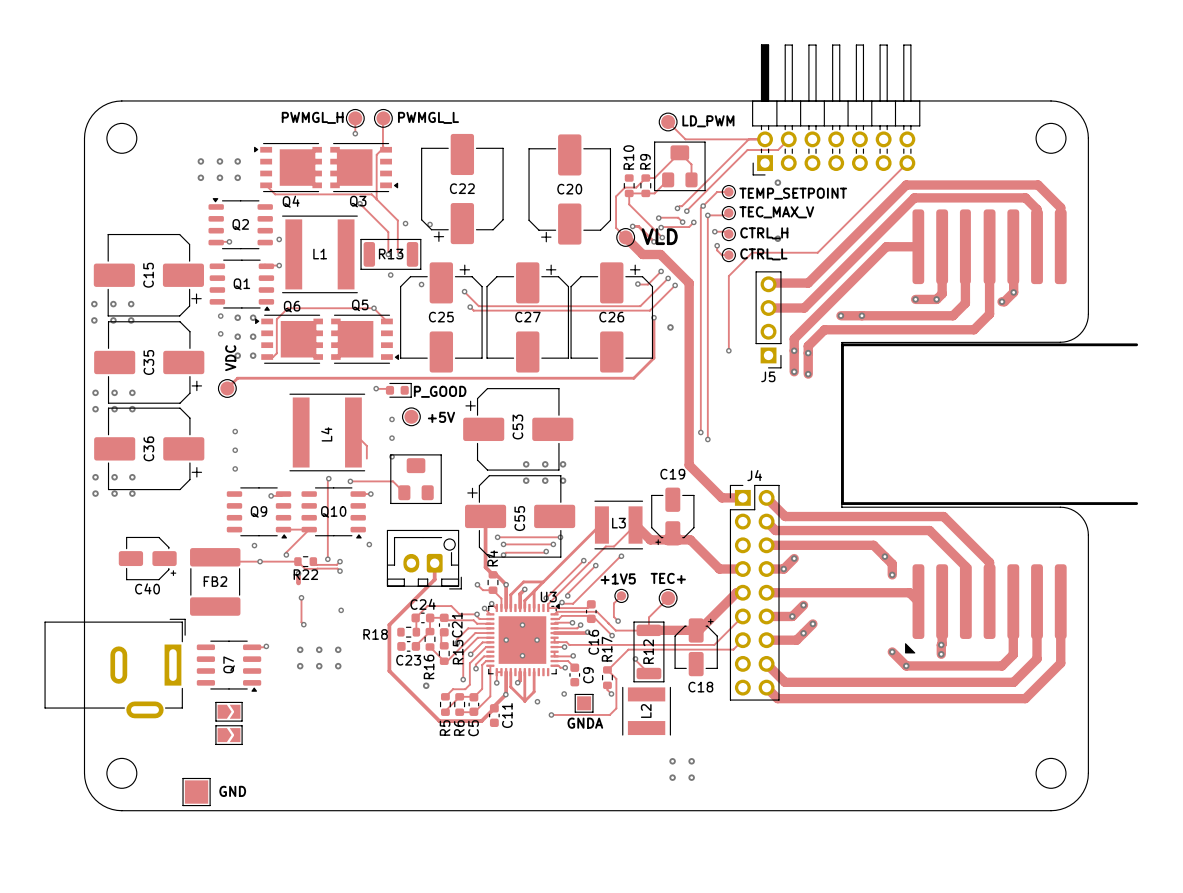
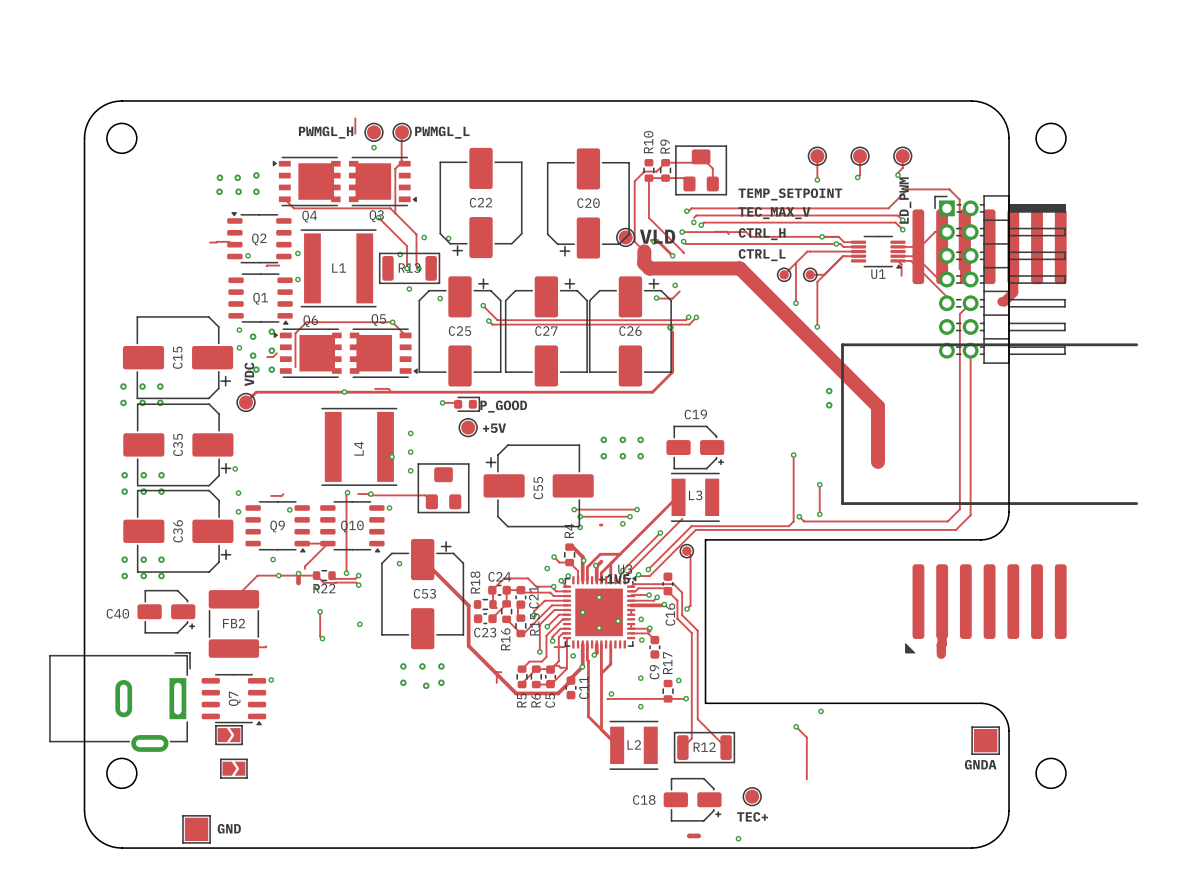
board edge: (971, 100) (1055, 101) (1069, 105) (1083, 119) (1088, 138) (1087, 321) (1077, 336) (1064, 342) (841, 342) (841, 507) (1060, 507) (1071, 509) (1082, 518) (1088, 535) (1088, 773) (1085, 787) (1073, 802) (1060, 809) (1051, 810) (121, 810) (107, 807) (95, 799) (87, 787) (84, 773) -> (971, 100) (985, 103) (998, 111) (1004, 119) (1008, 133) (1009, 511) (1006, 522) (998, 534) (980, 539) (705, 539) (705, 703) (980, 703) (991, 705) (1005, 717) (1009, 731) (1008, 815) (1004, 829) (994, 840) (985, 845) (971, 848) (116, 847) (99, 840) (87, 825) (84, 810) (84, 773)
part: (836, 109) -> none
track: (382, 116) (382, 146) (386, 149) (381, 149) (376, 154) (376, 199) -> (401, 130) (401, 160) (404, 163) (400, 163) (395, 168) (395, 213)
text position: PWMGL_H (312, 117) -> PWMGL_H (326, 132)
text position: PWMGL_L (428, 117) -> PWMGL_L (442, 132)
part: (355, 118) -> none
part: (383, 118) -> none
track: (668, 121) (685, 139) (765, 139) -> none
part: (668, 121) -> none
text: LD_PWM (708, 121) -> none
part: none -> (373, 132)
part: none -> (402, 132)
via position: (355, 133) -> (373, 147)
track: (748, 139) (681, 206) (677, 208) -> none
track: (788, 139) (778, 150) (747, 150) (686, 211) -> none
track: none -> (817, 156) (817, 179)
part: none -> (817, 156)
track: none -> (860, 156) (860, 175) (857, 177)
part: none -> (860, 156)
track: none -> (902, 156) (902, 168) (898, 175)
part: none -> (902, 156)
via: (200, 161) -> none
via: (219, 161) -> none
via: (237, 161) -> none
track: (907, 163) (817, 252) (752, 252) (728, 276) (728, 350) -> none
part position: (679, 166) -> (701, 170)
Q4 position: (288, 167) -> (306, 181)
Q3 position: (364, 167) -> (382, 181)
via: none -> (256, 175)
via: none -> (898, 175)
via: (200, 177) -> none
via: none -> (857, 177)
track: (668, 179) (654, 193) (629, 193) (629, 204) (662, 237) -> none
track: (691, 179) (691, 164) (679, 152) (654, 178) (645, 178) (636, 187) (624, 187) (616, 196) (616, 227) (642, 254) (660, 254) (689, 283) (689, 465) (721, 497) (742, 497) -> none
via: none -> (817, 179)
via: (777, 182) -> none
track: none -> (689, 183) (683, 178) (648, 178) (648, 217) (683, 253)
track: none -> (712, 183) (712, 168) (701, 156) (695, 162) (665, 162) (656, 171) (644, 171) (634, 181) (634, 241) (644, 251) (644, 263) (649, 268) (739, 268) (877, 406) (877, 461)
track: (266, 185) (275, 194) (371, 194) (397, 220) (397, 252) (400, 254) -> (284, 199) (293, 208) (390, 208) (416, 234) (416, 266) (418, 268)
R10 position: (629, 185) -> (648, 170)
R9 position: (645, 185) -> (665, 170)
C22 position: (462, 189) -> (481, 203)
C20 position: (569, 189) -> (588, 203)
via: none -> (219, 191)
via: none -> (238, 191)
via: none -> (256, 191)
track: (728, 192) (717, 192) (700, 208) (700, 432) -> none
part: (728, 192) -> none
text: none -> LD_PWM (905, 200)
track: (359, 203) (388, 232) (388, 254) -> (378, 217) (407, 246) (407, 268)
via: (359, 203) -> none
via: (703, 206) -> none
via: (677, 208) -> none
track: none -> (689, 210) (691, 208) (888, 208) (907, 189) (949, 189) (959, 199) (959, 268) (970, 279)
track: (728, 213) (726, 215) (707, 215) (707, 439) -> none
part: (728, 213) -> none
via: (707, 215) -> none
via: none -> (378, 217)
track: none -> (694, 217) (696, 215) (898, 215) (902, 220)
track: (658, 218) (678, 217) (682, 222) -> none
via: (658, 218) -> none
via: none -> (902, 220)
via: (682, 222) -> none
track: (693, 222) (689, 227) (661, 227) -> none
Q2 position: (240, 223) -> (259, 237)
via: (405, 223) -> none
via: (430, 224) -> none
track: none -> (701, 225) (703, 222) (895, 222) (902, 229)
via: none -> (701, 225)
track: (632, 226) (638, 226) (654, 241) -> (651, 240) (657, 240) (672, 255)
via: (632, 226) -> none
via: (661, 227) -> none
via: none -> (902, 229)
via: (714, 231) -> none
track: none -> (682, 232) (746, 232) (750, 236) (838, 236) (844, 242) (858, 242)
via: none -> (682, 232)
track: none -> (946, 232) (935, 232) (920, 246) (897, 246)
part: (728, 234) -> none
via: none -> (822, 236)
via: none -> (424, 237)
via: (662, 237) -> none
via: none -> (448, 238)
via: (777, 238) -> none
via: (279, 239) -> none
via: (229, 241) -> none
track: none -> (683, 241) (686, 243) (840, 243) (843, 246) (858, 246)
via: none -> (683, 241)
via: none -> (836, 243)
track: (717, 245) (717, 250) (721, 255) (728, 255) -> none
via: (717, 245) -> none
track: (918, 246) (886, 246) (794, 338) (794, 371) -> none
track: (942, 246) (942, 293) (936, 299) (915, 299) -> none
track: (965, 246) (965, 303) (952, 315) (840, 315) -> none
track: (989, 246) (989, 314) (973, 329) (824, 329) (808, 346) (808, 374) -> none
track: (1037, 246) (1037, 209) (1025, 197) (914, 197) (804, 308) (768, 308) -> none
track: (1060, 246) (1060, 207) (1038, 185) (906, 185) (808, 283) (768, 284) -> none
track: none -> (858, 251) (807, 251) (784, 274)
U1: none -> (878, 252)
via: none -> (297, 253)
L1 position: (319, 254) -> (338, 268)
via: (388, 254) -> none
R13 position: (390, 254) -> (409, 268)
via: none -> (248, 255)
via: none -> (672, 255)
part: (728, 255) -> none
track: none -> (858, 256) (843, 256) (817, 281) (817, 326)
track: none -> (897, 256) (915, 256) (938, 279) (946, 279)
track: none -> (796, 262) (796, 303)
via: (279, 265) -> none
via: none -> (407, 268)
via: none -> (418, 268)
track: (661, 271) (648, 284) (637, 284) -> none
via: (661, 271) -> none
part: none -> (784, 274)
track: none -> (810, 274) (824, 274)
part: none -> (810, 274)
C15 position: (148, 275) -> (178, 357)
via: (390, 275) -> none
track: none -> (901, 275) (901, 264) (897, 260) (910, 260) (946, 296) (946, 303)
track: (668, 278) (640, 306) (478, 306) (464, 291) -> none
via: (668, 278) -> none
via: none -> (297, 279)
part: none -> (999, 279)
via: (421, 284) -> none
via: (637, 284) -> none
Q1 position: (241, 285) -> (260, 299)
track: (675, 285) (649, 310) (473, 310) (470, 307) -> none
via: none -> (409, 289)
via: (464, 291) -> none
track: none -> (679, 291) (672, 298) (656, 298)
via: (1013, 292) -> none
via: none -> (440, 298)
via: none -> (656, 298)
via: (915, 299) -> none
via: (936, 299) -> none
via: (1002, 301) -> none
via: none -> (796, 303)
track: none -> (970, 303) (959, 313) (959, 509) (947, 521) (803, 521) (799, 516)
via: (94, 304) -> none
via: (113, 304) -> none
via: (131, 304) -> none
track: none -> (483, 305) (497, 320) (685, 320) (688, 317)
via: none -> (483, 305)
via: (470, 307) -> none
via: (374, 308) -> none
via: (840, 315) -> none
via: (861, 315) -> none
via: (220, 316) -> none
via: (237, 317) -> none
via: (253, 317) -> none
C25 position: (441, 317) -> (460, 331)
C27 position: (527, 317) -> (546, 331)
C26 position: (611, 317) -> (630, 331)
track: (654, 317) (654, 358) (633, 378) (237, 378) (227, 388) -> (672, 331) (672, 372) (652, 392) (256, 392) (246, 402)
via: (654, 317) -> none
via: none -> (688, 317)
track: none -> (696, 317) (689, 324) (492, 324) (488, 321)
via: none -> (696, 317)
J5: (768, 319) -> none
via: (94, 320) -> none
via: (113, 320) -> none
via: (131, 320) -> none
track: (386, 321) (374, 308) (287, 308) (276, 319) (276, 353) -> (404, 335) (392, 322) (306, 322) (295, 333) (295, 367)
via: none -> (488, 321)
via: none -> (392, 322)
via: none -> (817, 326)
via: none -> (239, 330)
via: none -> (271, 331)
via: (220, 333) -> none
via: (237, 336) -> none
Q6 position: (289, 339) -> (307, 353)
Q5 position: (365, 339) -> (383, 353)
via: none -> (239, 347)
via: none -> (271, 350)
via: (728, 350) -> none
via: (794, 350) -> none
track: none -> (970, 350) (970, 515) (955, 529) (695, 529) (649, 576) (638, 574)
via: (808, 353) -> none
via: (237, 355) -> none
text position: VDC (230, 358) -> VDC (249, 374)
C35 position: (149, 362) -> (178, 444)
via: none -> (256, 369)
via: none -> (271, 369)
via: (794, 371) -> none
via: (808, 374) -> none
via: none -> (123, 386)
via: none -> (142, 386)
via: none -> (160, 386)
part position: (227, 388) -> (246, 402)
via: (376, 388) -> none
part position: (398, 390) -> (466, 404)
via: none -> (344, 391)
text position: P_GOOD (440, 391) -> P_GOOD (503, 406)
via: none -> (829, 391)
via: (95, 392) -> none
via: (114, 392) -> none
via: (132, 392) -> none
via: none -> (123, 402)
via: none -> (142, 402)
via: none -> (160, 402)
track: none -> (442, 402) (458, 404)
via: none -> (442, 402)
via: none -> (829, 405)
via: (95, 409) -> none
via: (114, 409) -> none
via: (132, 409) -> none
part position: (411, 416) -> (468, 427)
text position: +5V (441, 417) -> +5V (494, 428)
via: (392, 419) -> none
C53 rotation: 0° (518, 429) -> 90° clockwise (422, 594)
C53 position: (518, 429) -> (422, 594)
via: (235, 431) -> none
L4 position: (327, 432) -> (359, 446)
track: (353, 432) (366, 445) (366, 458) -> none
via: (700, 432) -> none
via: none -> (410, 433)
via: (392, 438) -> none
via: none -> (603, 439)
via: none -> (622, 439)
via: none -> (640, 439)
via: (707, 439) -> none
C36 position: (149, 448) -> (178, 531)
via: (235, 450) -> none
via: none -> (410, 452)
track: none -> (793, 455) (793, 521) (788, 526) (691, 526) (648, 569)
via: none -> (793, 455)
via: none -> (603, 456)
via: none -> (622, 456)
via: none -> (640, 456)
via: (526, 464) -> none
via: (545, 464) -> none
via: (563, 464) -> none
via: none -> (410, 470)
via: none -> (124, 475)
via: none -> (143, 475)
via: none -> (161, 475)
via: (95, 477) -> none
via: (114, 477) -> none
via: (132, 477) -> none
track: (328, 478) (327, 559) -> (347, 492) (346, 573)
via: (328, 478) -> none
part position: (416, 479) -> (443, 488)
via: (526, 480) -> none
via: (545, 480) -> none
via: (563, 480) -> none
track: (350, 481) (393, 481) (404, 492) -> none
via: (350, 481) -> none
track: none -> (819, 484) (819, 514)
via: none -> (819, 484)
via: none -> (124, 491)
via: none -> (143, 491)
via: none -> (161, 491)
via: none -> (347, 492)
via: (95, 493) -> none
via: (114, 493) -> none
via: (132, 493) -> none
via: none -> (238, 493)
via: (271, 495) -> none
track: none -> (369, 495) (425, 495) (431, 501)
track: none -> (678, 497) (601, 572) (601, 580)
track: (766, 497) (785, 516) (943, 516) (989, 562) (989, 601) -> none
via: none -> (389, 508)
via: none -> (289, 509)
via: none -> (574, 509)
via: none -> (637, 509)
via: none -> (238, 511)
Q9 position: (258, 512) -> (277, 526)
Q10 position: (333, 512) -> (352, 526)
via: none -> (819, 514)
track: (485, 516) (485, 567) (506, 584) -> none
C55 position: (520, 516) -> (538, 485)
via: none -> (580, 516)
via: none -> (629, 516)
C19 rotation: 0° (672, 516) -> 90° counterclockwise (695, 447)
C19 position: (672, 516) -> (695, 447)
via: none -> (799, 516)
track: none -> (682, 518) (624, 576)
track: (766, 521) (775, 530) (929, 530) (965, 566) (965, 601) -> none
via: none -> (622, 523)
track: (600, 525) (524, 600) (524, 607) -> none
L3 position: (618, 525) -> (695, 497)
via: none -> (580, 527)
track: (283, 529) (301, 529) -> (302, 543) (320, 543)
track: (309, 529) (286, 552) (286, 554) -> (327, 543) (305, 566) (305, 568)
via: none -> (660, 532)
track: (497, 537) (560, 537) -> (574, 509) (637, 509)
via: (497, 537) -> none
via: (560, 537) -> none
via: (369, 544) -> none
track: (503, 544) (553, 544) -> (580, 516) (629, 516)
via: (503, 544) -> none
via: (553, 544) -> none
via: (254, 545) -> none
track: (766, 545) (873, 545) (892, 563) (892, 574) -> none
track: none -> (569, 547) (572, 547) (582, 557)
track: (546, 551) (505, 552) (503, 555) -> none
via: (546, 551) -> none
track: none -> (686, 551) (690, 554) (690, 605) (687, 609)
via: (286, 554) -> none
via: (503, 555) -> none
track: (621, 556) (573, 603) (561, 602) -> none
via: (621, 556) -> none
via: (884, 556) -> none
via: none -> (554, 557)
C40 position: (147, 558) -> (166, 611)
track: (794, 558) (783, 569) (766, 569) -> none
via: (794, 558) -> none
via: none -> (124, 559)
via: none -> (143, 559)
via: none -> (161, 559)
via: none -> (273, 559)
via: (327, 559) -> none
track: none -> (422, 559) (468, 605) (468, 646) (516, 693) (558, 693) (582, 666) (582, 644)
part: (424, 559) -> none
track: (583, 560) (546, 598) -> (660, 532) (622, 570)
track: (238, 561) (297, 561) (305, 568) (337, 568) (340, 571) -> none
via: (260, 561) -> none
R22 position: (305, 561) -> (324, 575)
track: (313, 561) (316, 564) (336, 564) (340, 561) -> (332, 575) (335, 578) (355, 578) (358, 575)
via: (340, 561) -> none
via: none -> (399, 563)
track: (434, 563) (434, 579) (389, 624) (389, 671) (439, 721) (481, 721) (506, 694) (506, 672) -> none
track: (595, 565) (567, 593) (567, 595) -> none
via: none -> (547, 568)
via: none -> (648, 569)
track: (742, 569) (719, 569) (690, 539) (679, 539) (672, 533) (666, 539) (650, 539) (635, 525) (614, 546) (605, 546) (548, 604) (548, 607) (587, 608) (591, 604) -> none
via: (783, 569) -> none
via: none -> (622, 570)
via: (340, 571) -> none
via: none -> (346, 573)
via: none -> (638, 574)
via: (892, 574) -> none
via: none -> (278, 575)
via: none -> (358, 575)
via: none -> (124, 576)
via: none -> (143, 576)
via: none -> (161, 576)
via: none -> (568, 576)
text: TEC+ (668, 578) -> none
via: none -> (561, 580)
FB2 position: (215, 581) -> (233, 623)
track: (543, 581) (523, 581) (510, 594) (510, 607) -> (620, 554) (600, 554) (587, 567) (587, 580)
R4 position: (493, 582) -> (569, 554)
track: (477, 584) (482, 590) (493, 590) (501, 598) (501, 607) -> (554, 557) (559, 562) (569, 562) (578, 570) (578, 580)
via: (477, 584) -> none
track: (506, 584) (506, 607) -> (582, 557) (582, 580)
via: (506, 584) -> none
track: none -> (358, 585) (356, 582) (323, 582) (316, 575) (257, 575) (233, 599)
via: none -> (358, 585)
via: none -> (553, 586)
track: none -> (631, 586) (633, 584) (673, 584) (682, 592) (682, 615) (697, 630) (697, 719) (726, 747)
via: none -> (317, 587)
C40 name position: C40 (147, 588) -> C40 (117, 613)
track: (524, 589) (520, 594) (520, 607) -> (601, 561) (596, 566) (596, 580)
via: (524, 589) -> none
track: (534, 591) (534, 607) -> (610, 563) (610, 580)
track: none -> (631, 591) (635, 591) (638, 588) (665, 588) (677, 600) (677, 618) (691, 633) (691, 738) (682, 747)
track: (742, 592) (736, 592) (698, 630) (648, 630) -> none
J4: (754, 592) -> none
track: (766, 592) (909, 592) (918, 601) -> none
via: (567, 595) -> none
track: (621, 595) (613, 603) (613, 616) (618, 621) -> none
part position: (621, 595) -> (686, 551)
via: none -> (649, 595)
track: (301, 597) (301, 622) (303, 624) -> (320, 611) (320, 636) (322, 638)
via: (301, 597) -> none
via: none -> (599, 597)
via: none -> (657, 597)
via: (546, 598) -> none
track: (668, 598) (648, 617) (648, 630) -> none
part: (668, 598) -> none
track: (1013, 601) (1013, 654) (1002, 665) (906, 665) (892, 651) -> none
track: (1037, 601) (1037, 658) (1013, 682) (784, 682) (766, 663) -> none
track: (1060, 601) (1060, 663) (1025, 698) (777, 698) (766, 687) -> none
via: (561, 602) -> none
via: (491, 603) -> none
via: none -> (664, 604)
track: (803, 605) (792, 616) (766, 616) -> none
via: (803, 605) -> none
track: (484, 608) (490, 614) -> (561, 580) (566, 586)
via: (484, 608) -> none
via: none -> (687, 609)
via: (341, 610) -> none
track: none -> (631, 610) (631, 614)
via: none -> (320, 611)
C16 position: (591, 611) -> (667, 583)
via: none -> (582, 612)
via: (477, 614) -> none
track: (554, 614) (557, 611) (597, 611) (608, 623) -> none
via: none -> (533, 615)
track: (742, 616) (714, 644) (569, 644) (566, 642) (554, 642) (554, 637) -> none
via: (792, 616) -> none
C24 position: (422, 617) -> (499, 590)
track: (490, 619) (479, 619) (477, 614) (459, 614) (451, 606) (427, 606) (415, 617) (416, 632) -> (566, 591) (556, 591) (553, 586) (536, 586) (527, 578) (504, 578) (492, 590) (492, 604)
track: (554, 619) (558, 619) (561, 615) (588, 615) (591, 618) (595, 618) (612, 635) -> none
via: none -> (641, 619)
track: (572, 622) (554, 623) -> (649, 595) (631, 596)
via: (572, 622) -> none
track: (490, 623) (477, 623) (473, 620) (446, 620) (444, 617) (430, 617) (430, 631) (415, 646) -> (566, 596) (553, 596) (550, 592) (523, 592) (520, 590) (506, 590) (506, 603) (492, 618)
track: (608, 623) (615, 630) (648, 630) -> none
track: (812, 623) (796, 640) (766, 640) -> none
via: (812, 623) -> none
via: (303, 624) -> none
via: none -> (359, 624)
C21 position: (444, 625) -> (520, 597)
via: (522, 625) -> none
track: (580, 625) (577, 628) (554, 628) -> (657, 597) (653, 600) (631, 600)
via: (580, 625) -> none
via: none -> (547, 626)
track: (490, 628) (468, 628) (457, 639) (457, 642) -> (566, 600) (544, 600) (533, 611) (533, 615)
via: none -> (599, 628)
via: none -> (649, 628)
R18 position: (408, 632) -> (485, 604)
track: (444, 632) (441, 635) (441, 646) -> (520, 604) (517, 607) (517, 618)
track: (587, 632) (554, 633) -> (664, 604) (631, 605)
via: (587, 632) -> none
track: (490, 633) (475, 633) (447, 661) (444, 661) (430, 646) (428, 648) -> (566, 605) (552, 605) (523, 633) (520, 633) (506, 619) (505, 620)
track: none -> (631, 633) (648, 633) (654, 640)
via: (803, 633) -> none
R18 name rotation: 0° (375, 634) -> 90° counterclockwise (475, 582)
R18 name position: R18 (375, 634) -> R18 (475, 582)
via: (612, 635) -> none
track: (490, 637) (477, 637) (463, 652) (463, 679) -> (566, 610) (554, 610) (539, 624) (539, 651)
via: none -> (322, 638)
track: none -> (566, 638) (566, 668) (551, 684) (536, 684)
R16 position: (430, 639) -> (506, 611)
U3 position: (523, 639) -> (599, 612)
via: (506, 640) -> none
via: (537, 640) -> none
via: none -> (641, 640)
track: (742, 640) (733, 649) (628, 649) (607, 669) (616, 678) (616, 708) (609, 714) (551, 714) -> none
via: none -> (552, 641)
via: (457, 642) -> none
track: (490, 642) (482, 642) (470, 654) -> (566, 614) (559, 614) (547, 626)
track: none -> (587, 644) (588, 716) (617, 745)
track: none -> (610, 644) (610, 664) (601, 673) (601, 729)
via: (941, 644) -> none
via: (266, 646) -> none
C23 position: (408, 646) -> (485, 618)
track: (490, 647) (486, 647) (469, 663) (469, 684) (465, 689) (452, 689) (445, 696) -> (566, 619) (562, 619) (546, 635) (546, 657) (541, 661) (529, 661) (522, 669)
via: (564, 647) -> none
C18 rotation: 0° (696, 647) -> 90° clockwise (692, 799)
C18 position: (696, 647) -> (692, 799)
via: (300, 649) -> none
via: (319, 649) -> none
via: (338, 649) -> none
via: none -> (539, 651)
track: (554, 651) (554, 656) (573, 655) -> (631, 624) (631, 628) (649, 628)
R12 rotation: 0° (648, 651) -> 90° clockwise (704, 747)
R12 position: (648, 651) -> (704, 747)
via: (892, 651) -> none
R15 position: (444, 653) -> (520, 625)
via: (470, 654) -> none
via: (941, 654) -> none
via: (522, 655) -> none
via: none -> (594, 655)
track: (490, 656) (484, 656) (475, 664) (476, 668) -> (566, 628) (560, 628) (552, 636) (552, 641)
track: (635, 658) (647, 673) -> none
via: (635, 658) -> none
track: (490, 661) (486, 661) (482, 665) (482, 688) (473, 697) (459, 696) (445, 712) -> (566, 633) (562, 633) (558, 637) (558, 661) (550, 669) (536, 669) (522, 684)
track: (554, 661) (568, 661) (574, 667) -> none
track: (490, 665) (490, 696) (474, 711) -> none
via: (906, 665) -> none
Q7 position: (229, 666) -> (233, 699)
via: (300, 666) -> none
via: (319, 666) -> none
via: (338, 666) -> none
via: none -> (403, 666)
via: none -> (422, 666)
via: none -> (441, 666)
via: none -> (582, 666)
via: (565, 667) -> none
part position: (115, 668) -> (119, 702)
via: (476, 668) -> none
track: (510, 672) (510, 687) (524, 701) (534, 691) (534, 672) -> none
track: (520, 672) (520, 680) (517, 682) -> (596, 644) (596, 652) (594, 655)
track: (524, 672) (524, 701) -> (601, 644) (601, 674)
C9 position: (574, 674) -> (654, 647)
C9 name position: C9 (588, 675) -> C9 (654, 672)
R17 position: (607, 677) -> (668, 691)
via: none -> (640, 678)
via: none -> (271, 679)
via: (463, 679) -> none
via: none -> (678, 680)
via: none -> (403, 682)
via: none -> (441, 682)
via: (496, 682) -> none
via: (517, 682) -> none
track: (607, 685) (607, 689) (611, 693) -> none
via: (564, 693) -> none
via: (505, 694) -> none
track: none -> (686, 698) (607, 699)
via: none -> (686, 698)
via: (537, 701) -> none
part: (584, 703) -> none
R5 position: (445, 704) -> (522, 676)
R6 position: (459, 704) -> (536, 676)
C5 position: (473, 704) -> (550, 676)
via: none -> (640, 706)
part position: (229, 711) -> (233, 768)
L2 rotation: 0° (646, 711) -> 90° clockwise (633, 745)
L2 position: (646, 711) -> (633, 745)
via: none -> (821, 711)
track: (459, 712) (473, 712) -> none
via: (551, 714) -> none
C11 position: (494, 715) -> (570, 687)
text: GNDA (585, 723) -> none
track: none -> (796, 726) (806, 737) (806, 779)
via: none -> (796, 726)
part: none -> (985, 740)
via: (672, 761) -> none
via: (691, 761) -> none
text: none -> GNDA (980, 764)
via: (672, 777) -> none
via: (691, 777) -> none
text position: GND (232, 791) -> GND (229, 828)
part position: (196, 792) -> (196, 829)
part: none -> (752, 796)
text: none -> TEC+ (752, 816)
part: none -> (693, 835)
via: none -> (738, 838)

